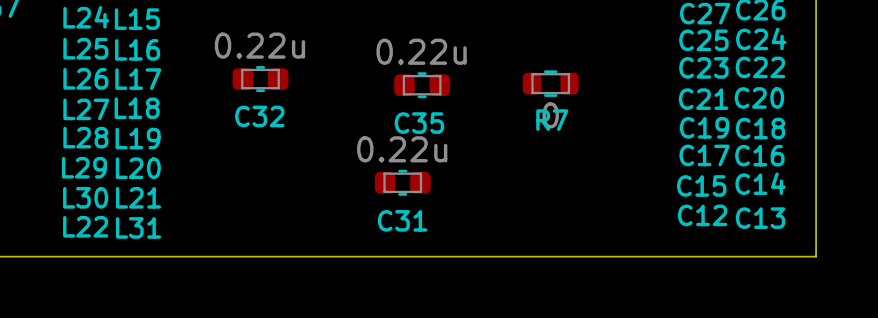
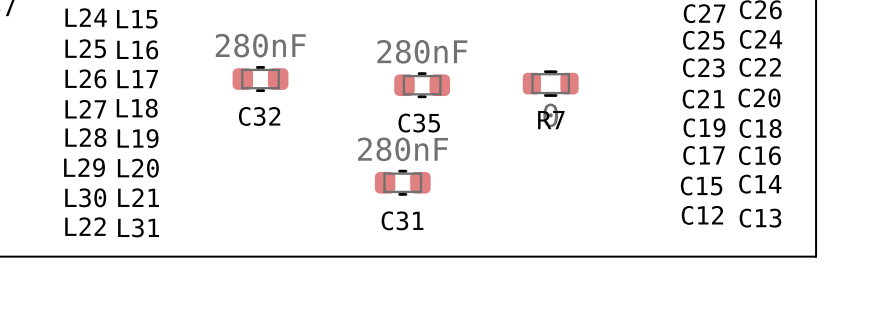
C32 value: 0.22u (259, 45) -> 280nF (260, 45)
C35 value: 0.22u (421, 51) -> 280nF (422, 51)
C31 value: 0.22u (402, 149) -> 280nF (402, 149)

